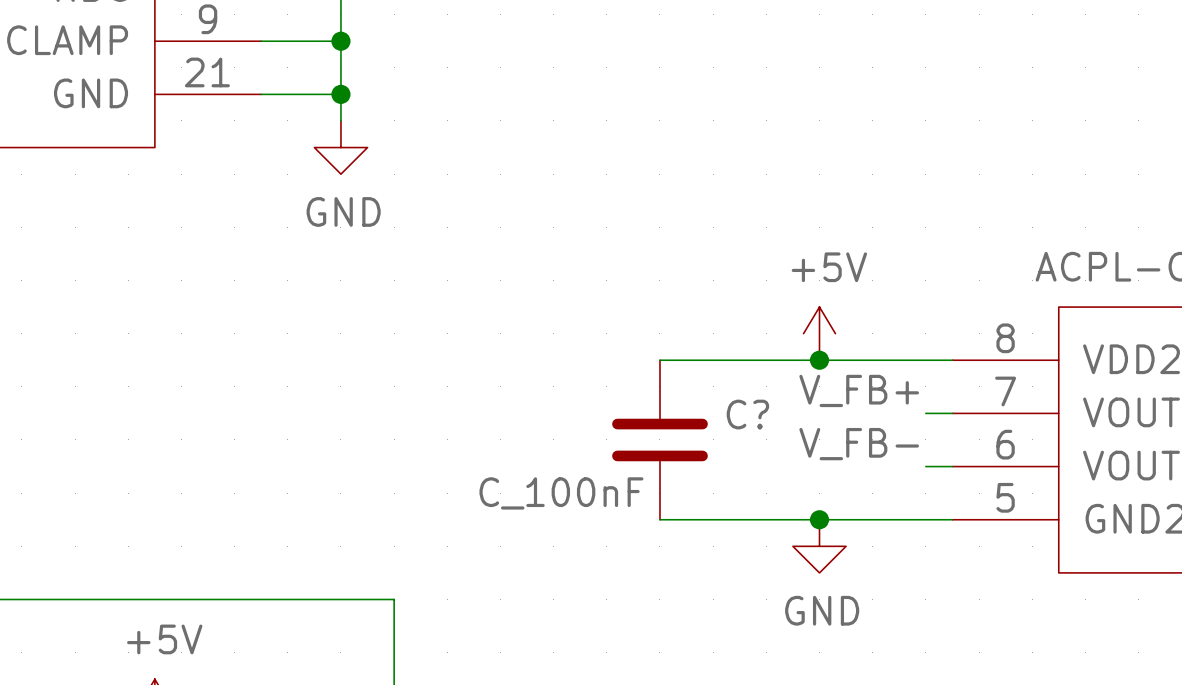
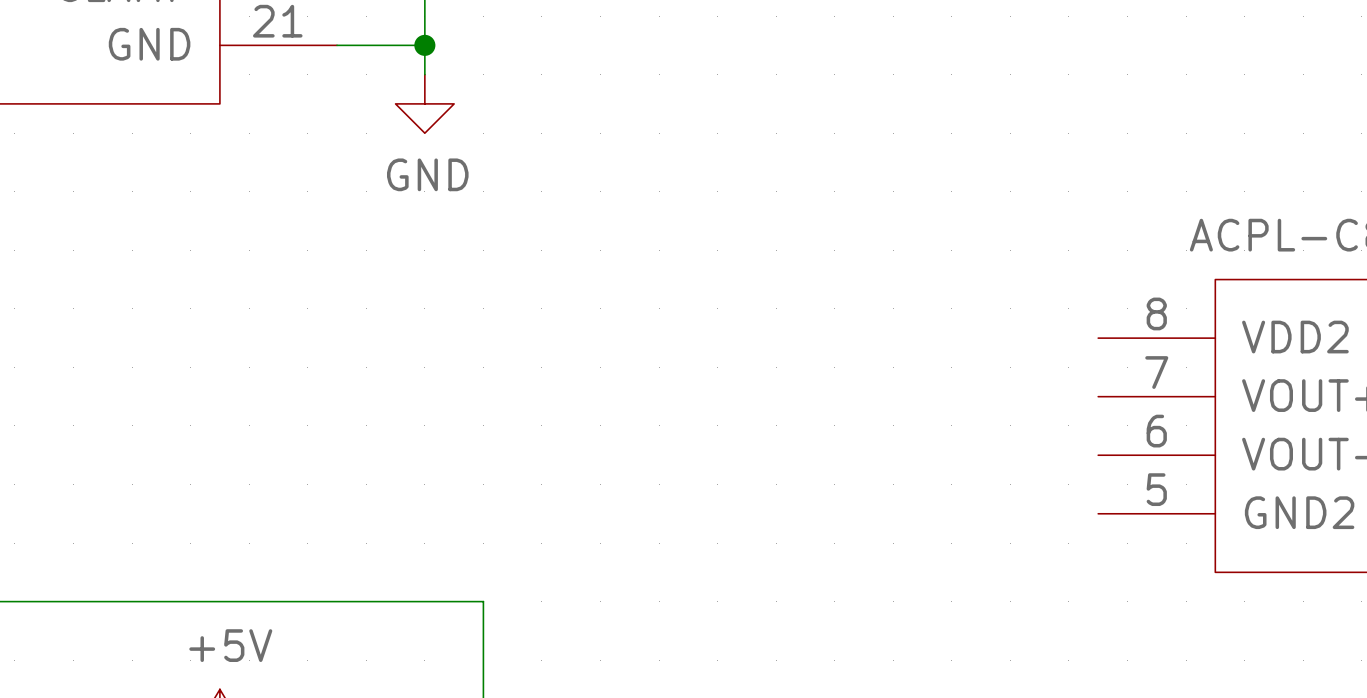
power symbol: +5V (819, 333) -> none
wire: (659, 360) (952, 360) -> none
junction: (819, 360) -> none
label: V_FB+ (859, 390) -> none
wire: (925, 413) (952, 413) -> none
C?: C_100nF (659, 439) -> none
label: V_FB- (859, 444) -> none
wire: (925, 466) (952, 466) -> none
wire: (659, 519) (952, 519) -> none
junction: (819, 519) -> none
power symbol: GND (819, 546) -> none

